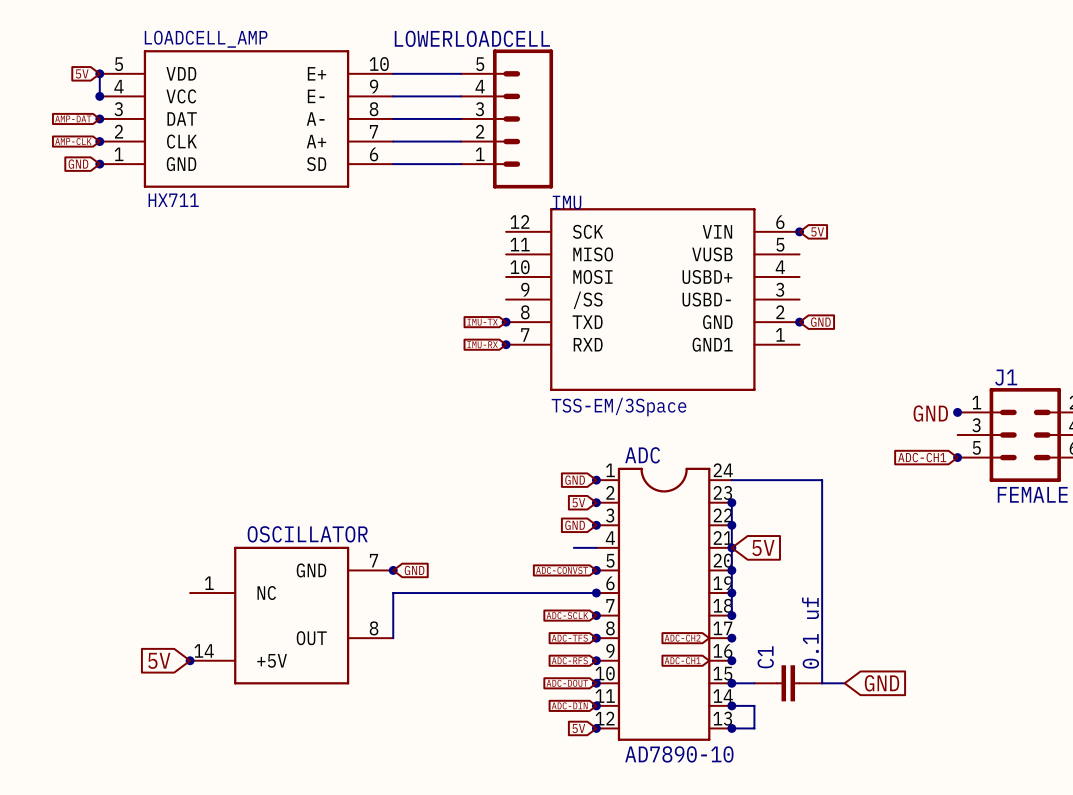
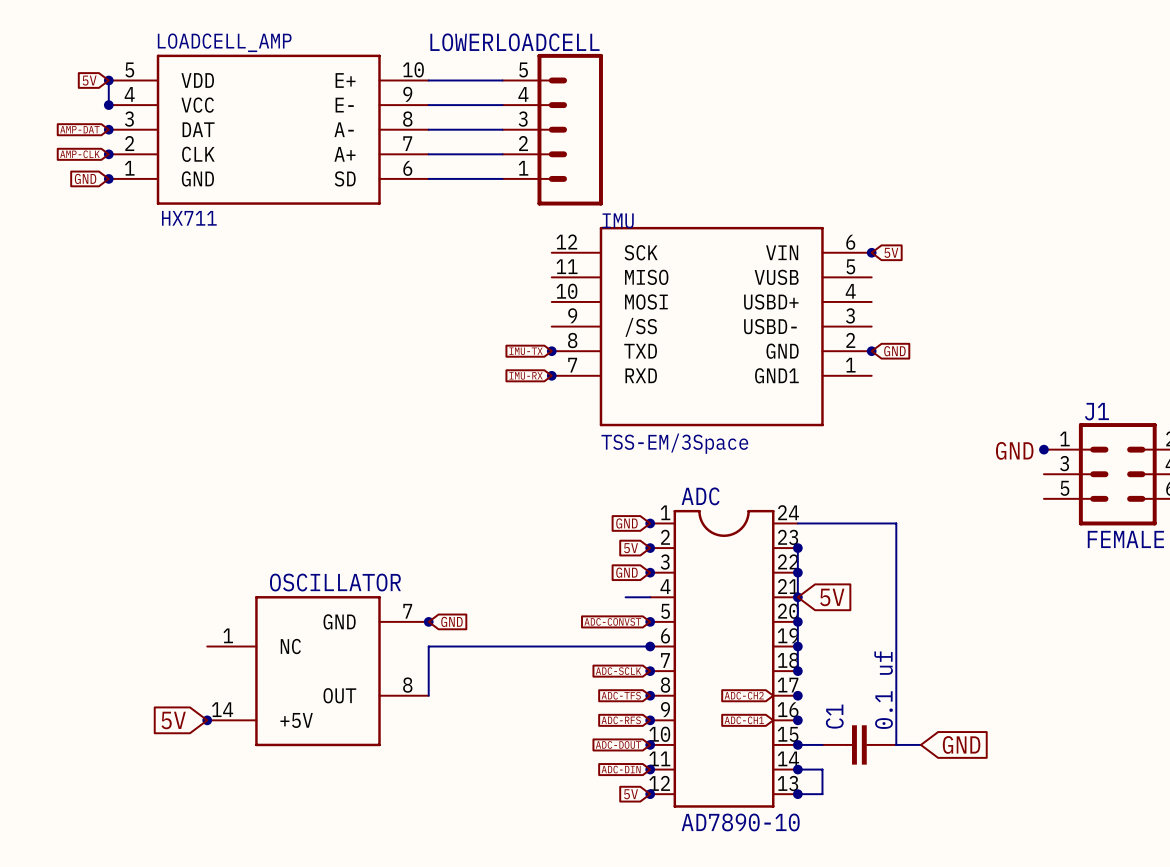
global label: ADC-CH1 (922, 457) -> none
junction: (957, 457) -> none

